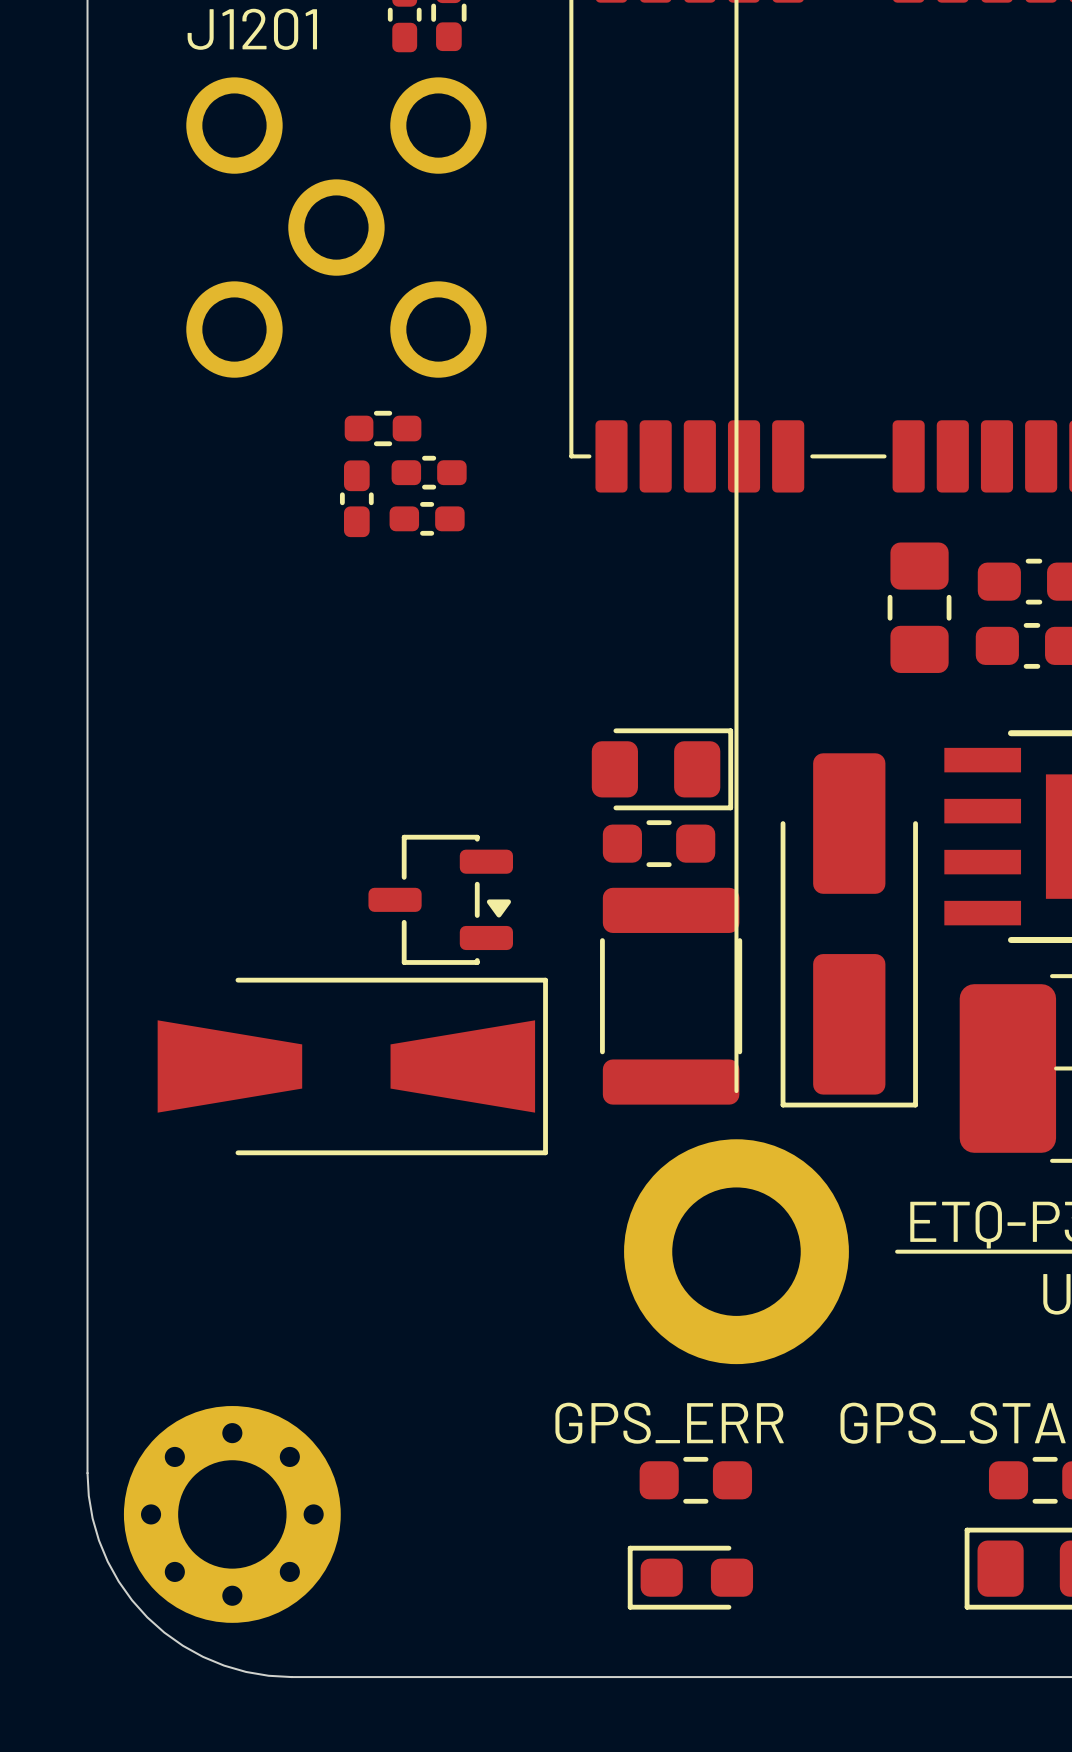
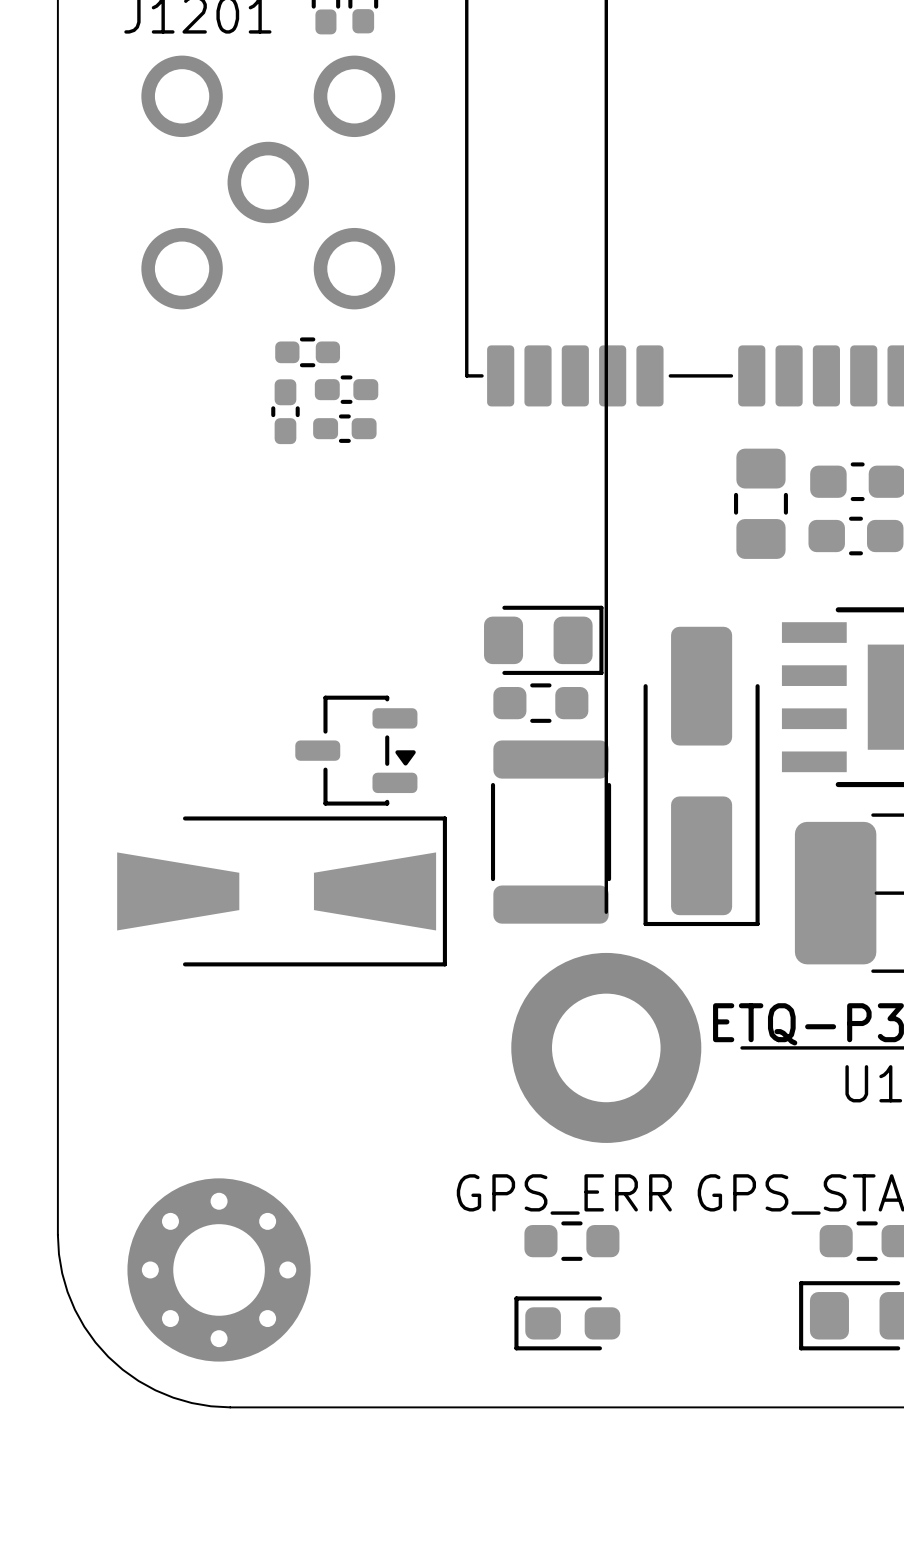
part position: (232, 1514) -> (219, 1269)

